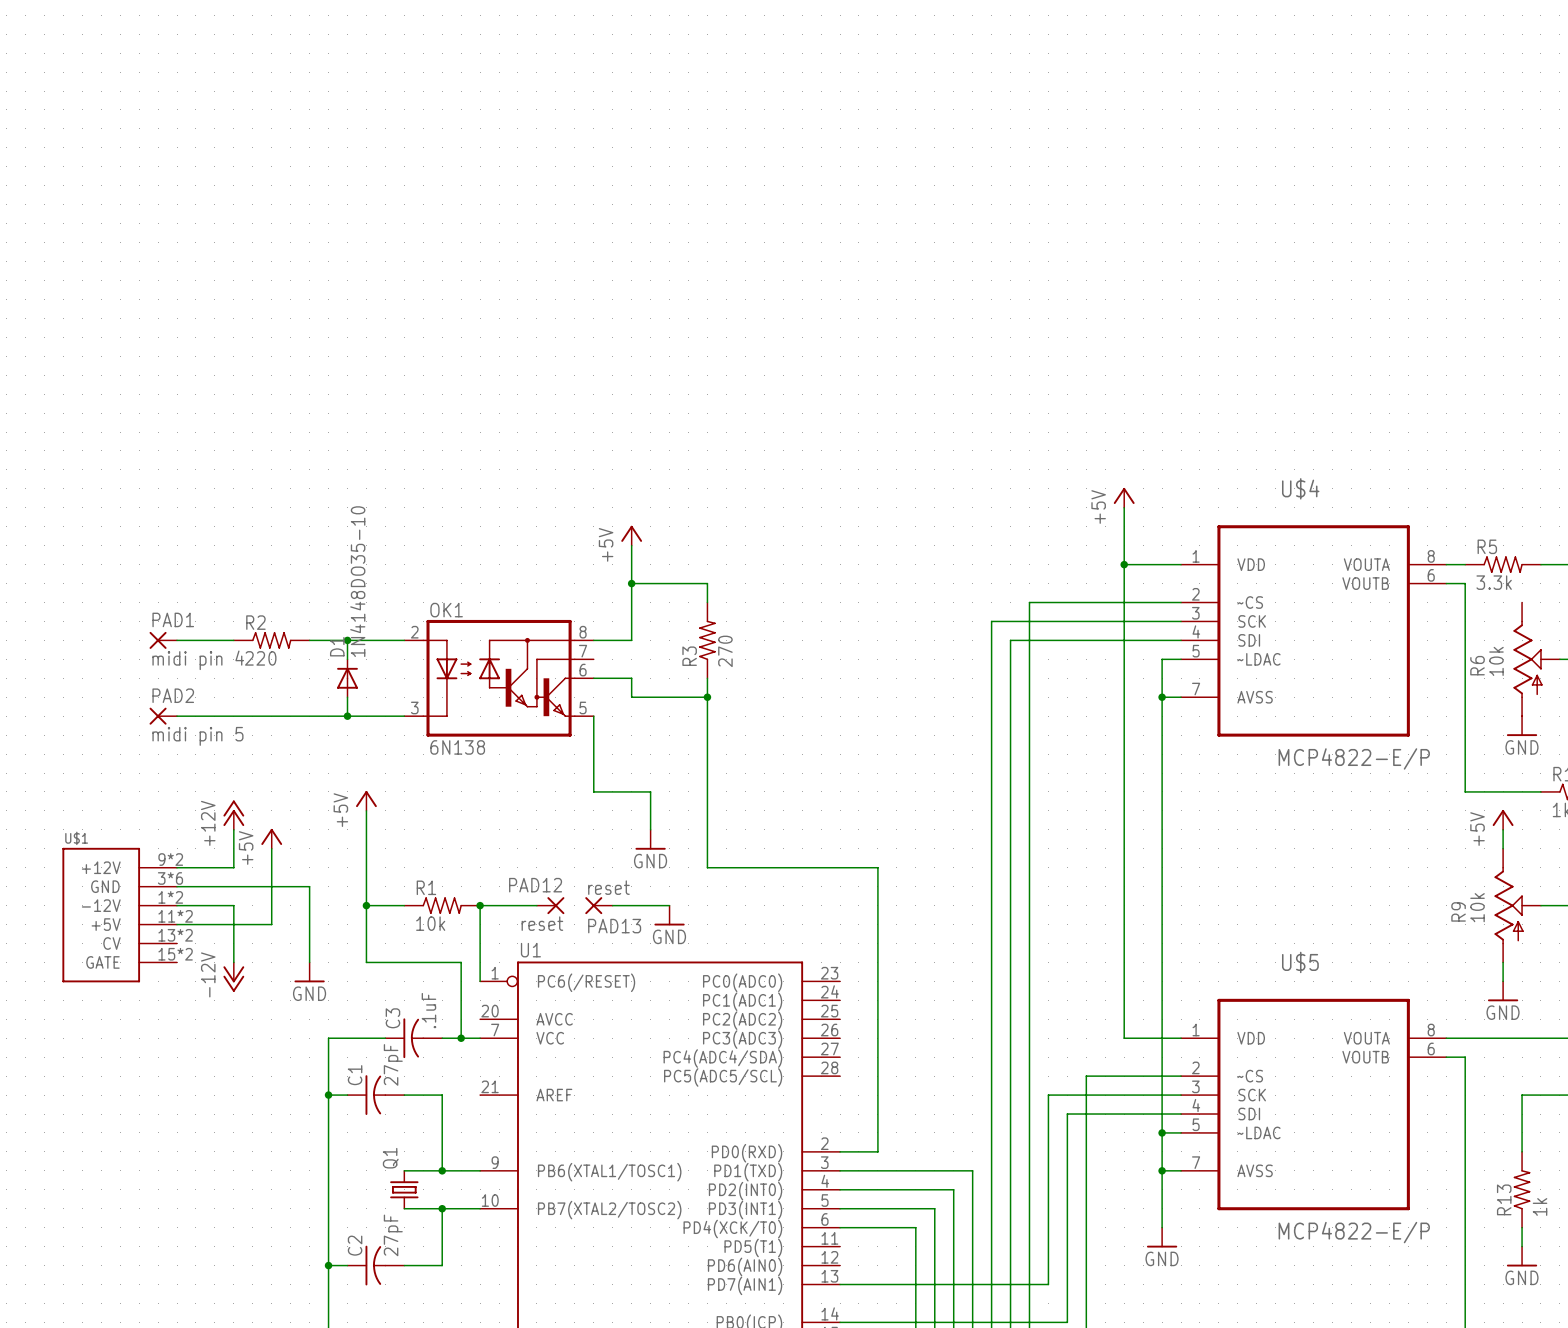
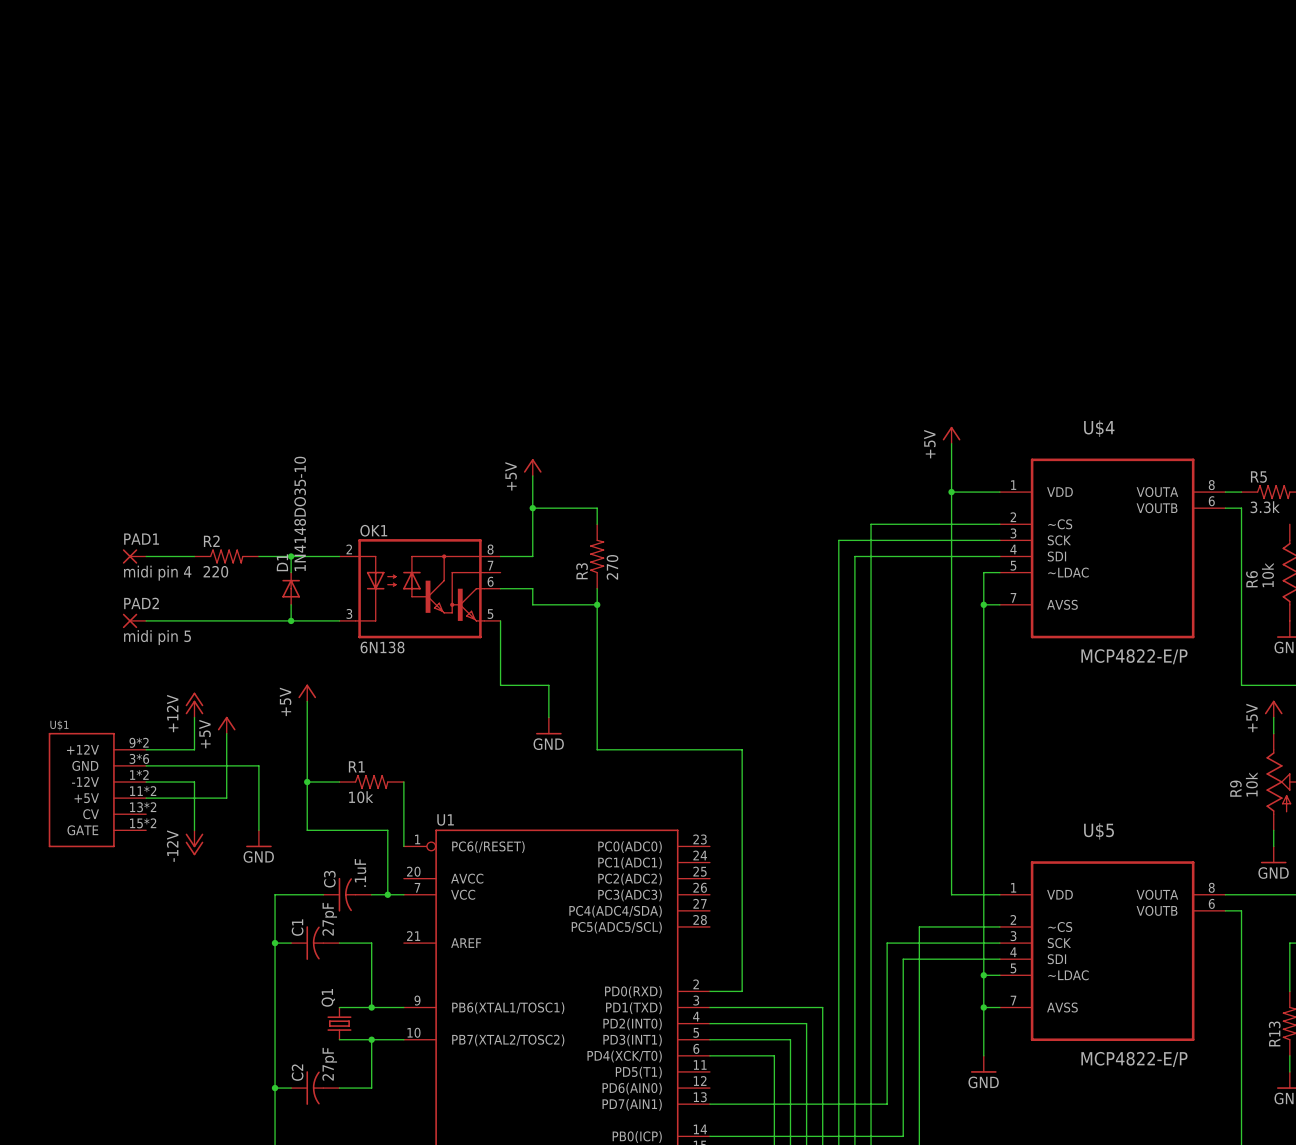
wire: (480, 905) (536, 905) -> none
junction: (480, 905) -> none
PAD12: reset (550, 905) -> none
PAD13: reset (598, 905) -> none
wire: (612, 905) (669, 905) -> none
power symbol: GND (669, 915) -> none

